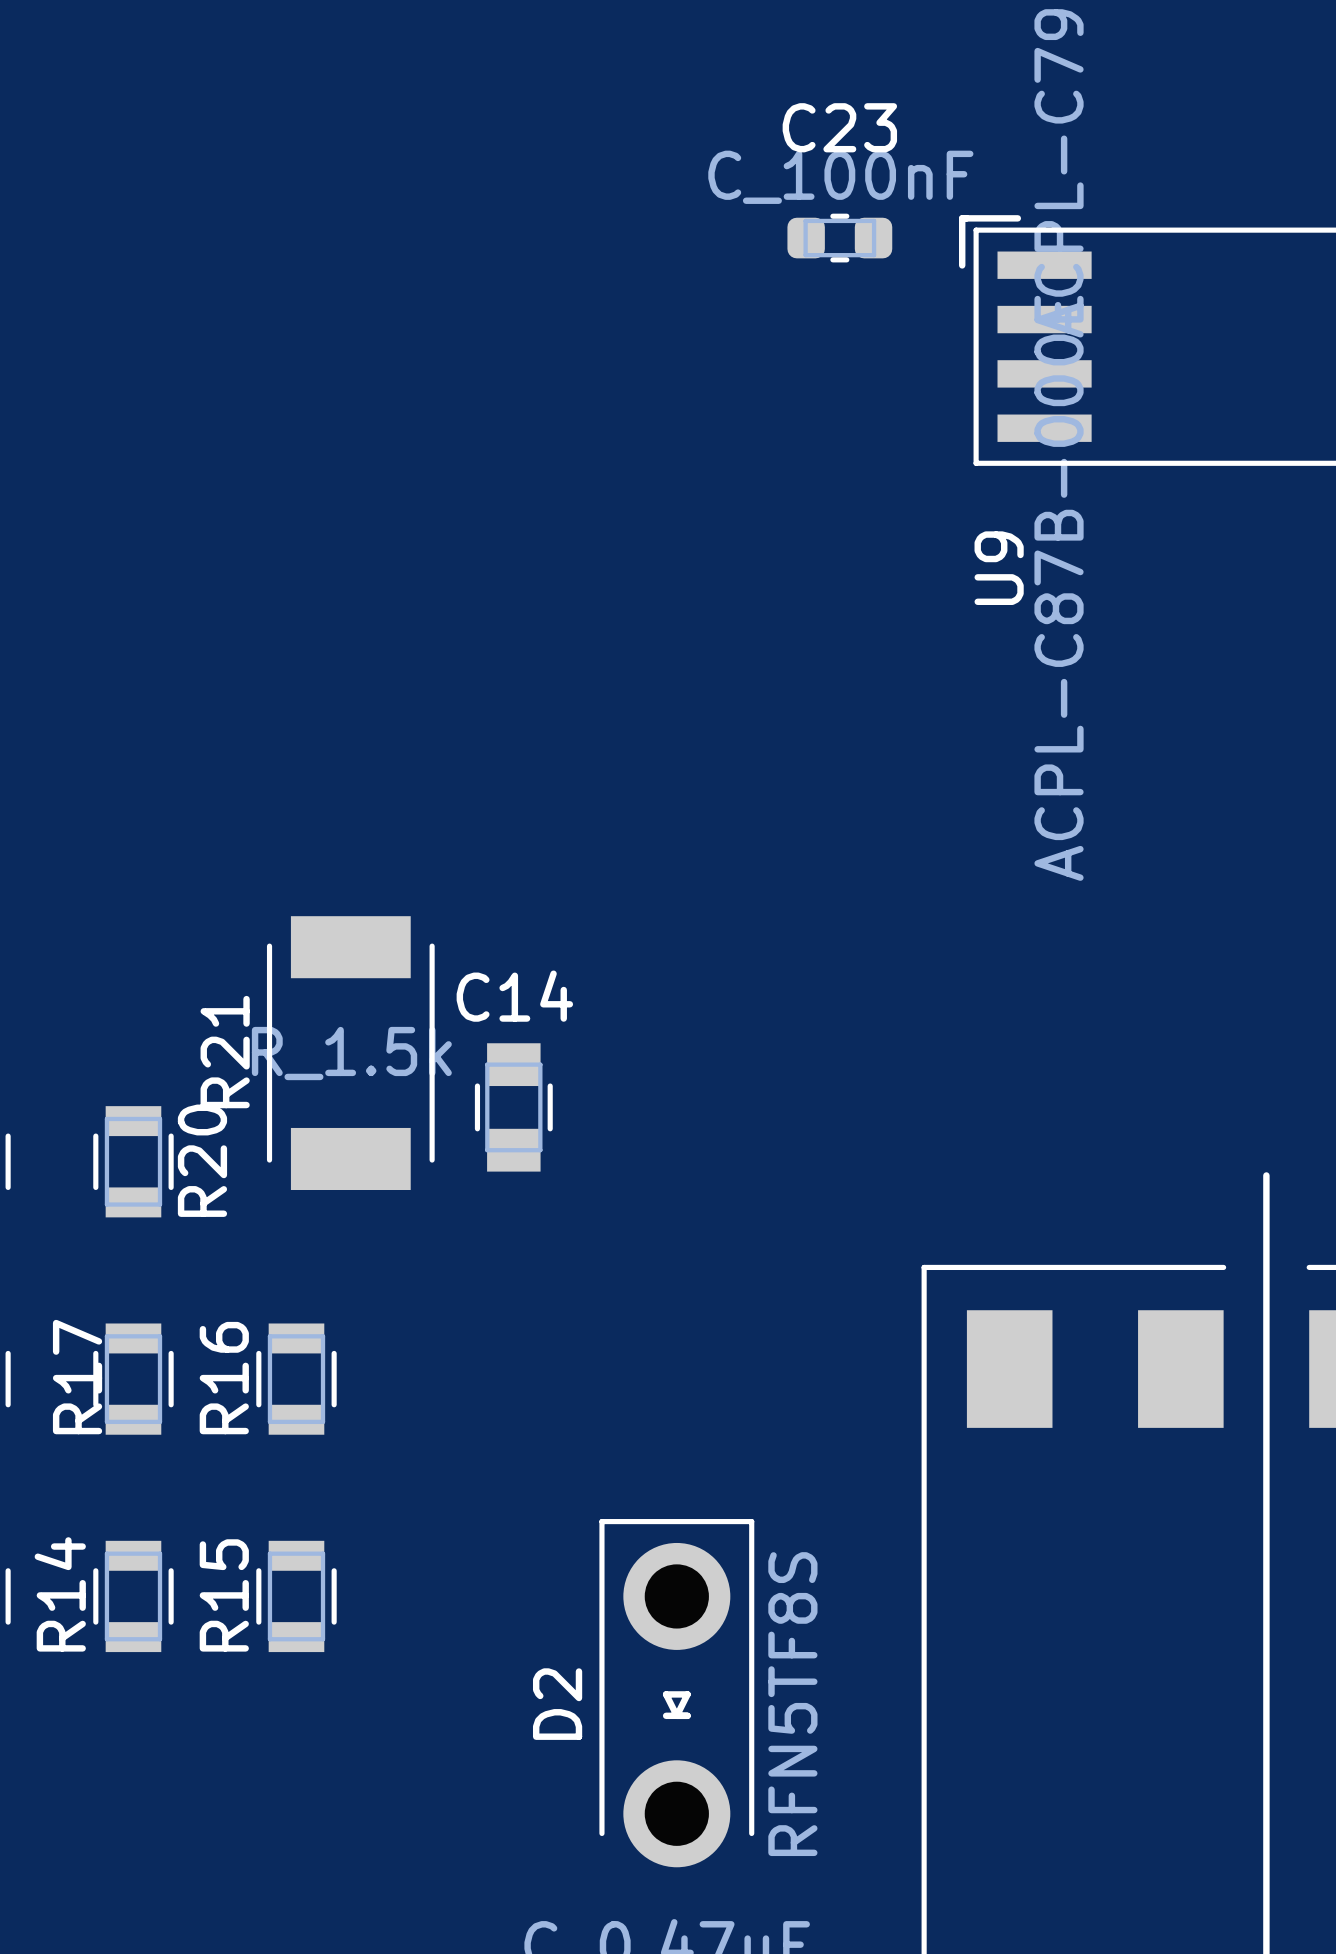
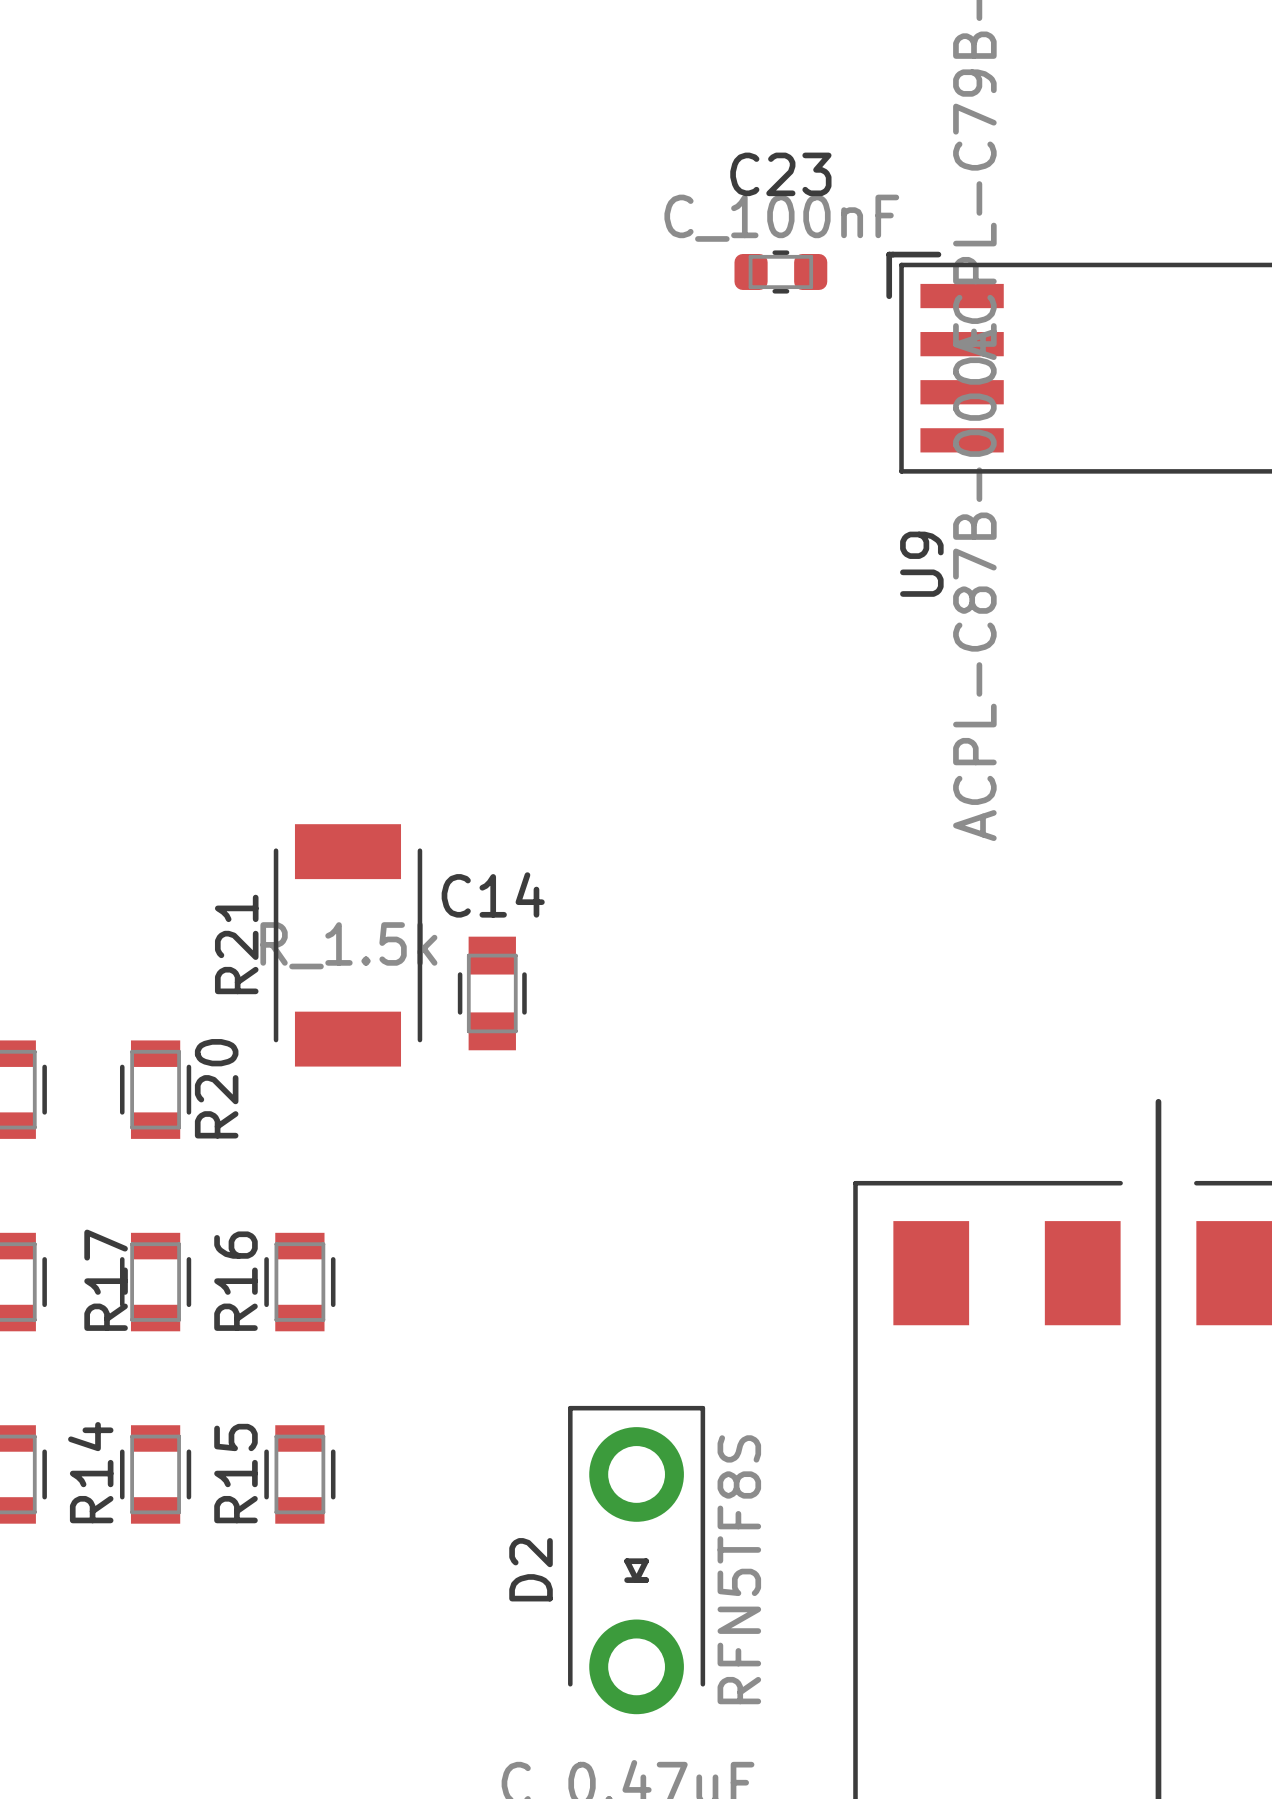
R21 position: (350, 1053) -> (347, 945)
C14 position: (513, 1107) -> (492, 993)

